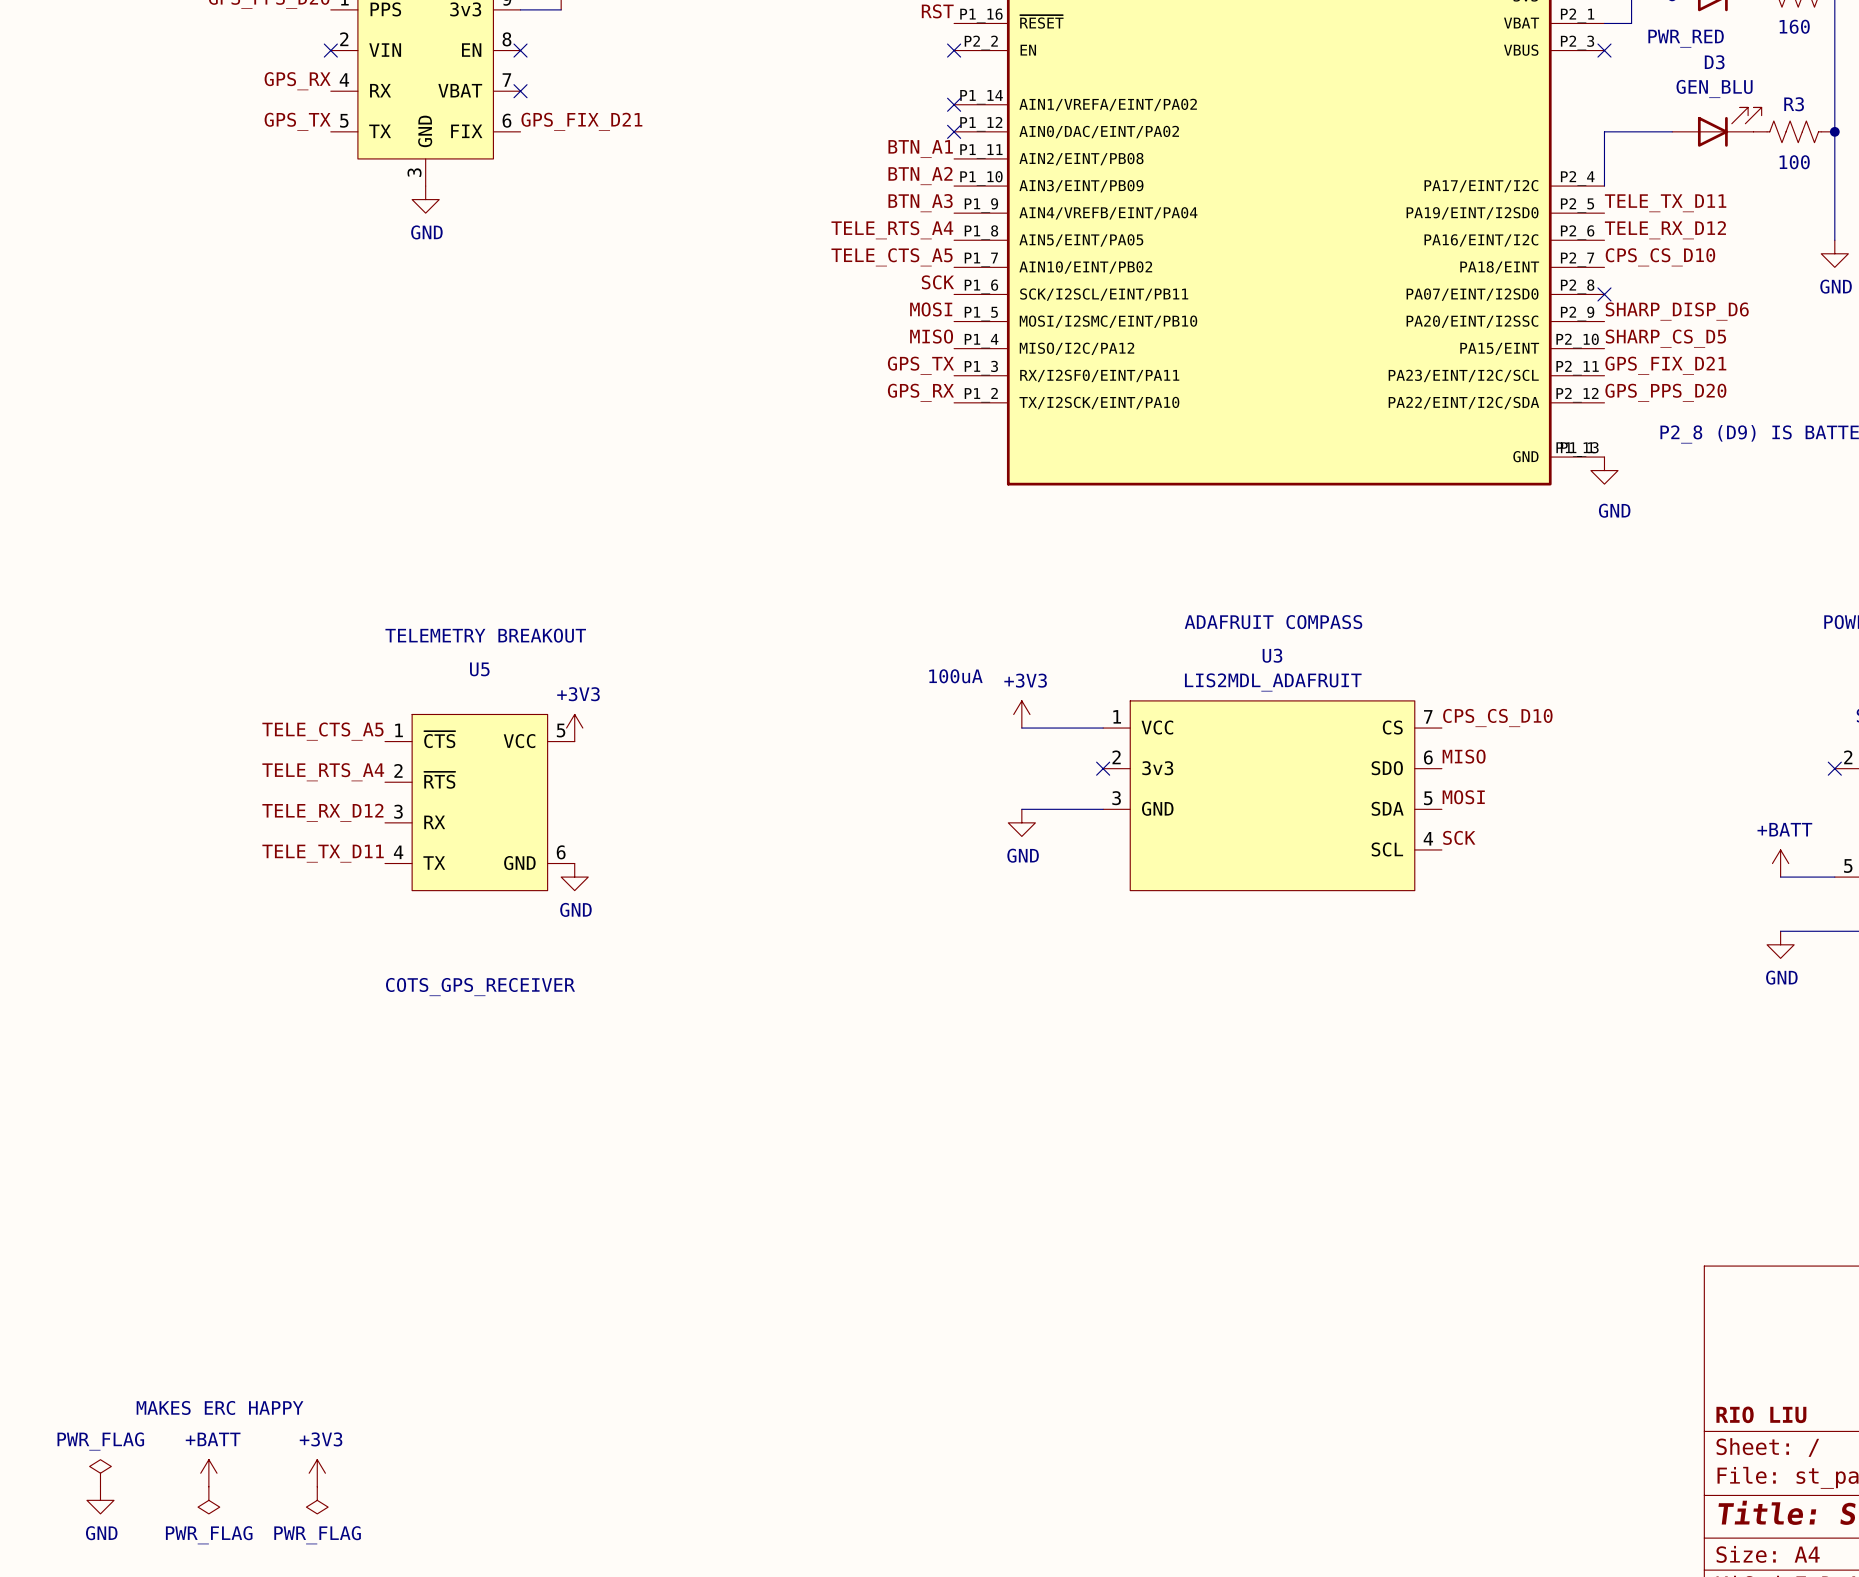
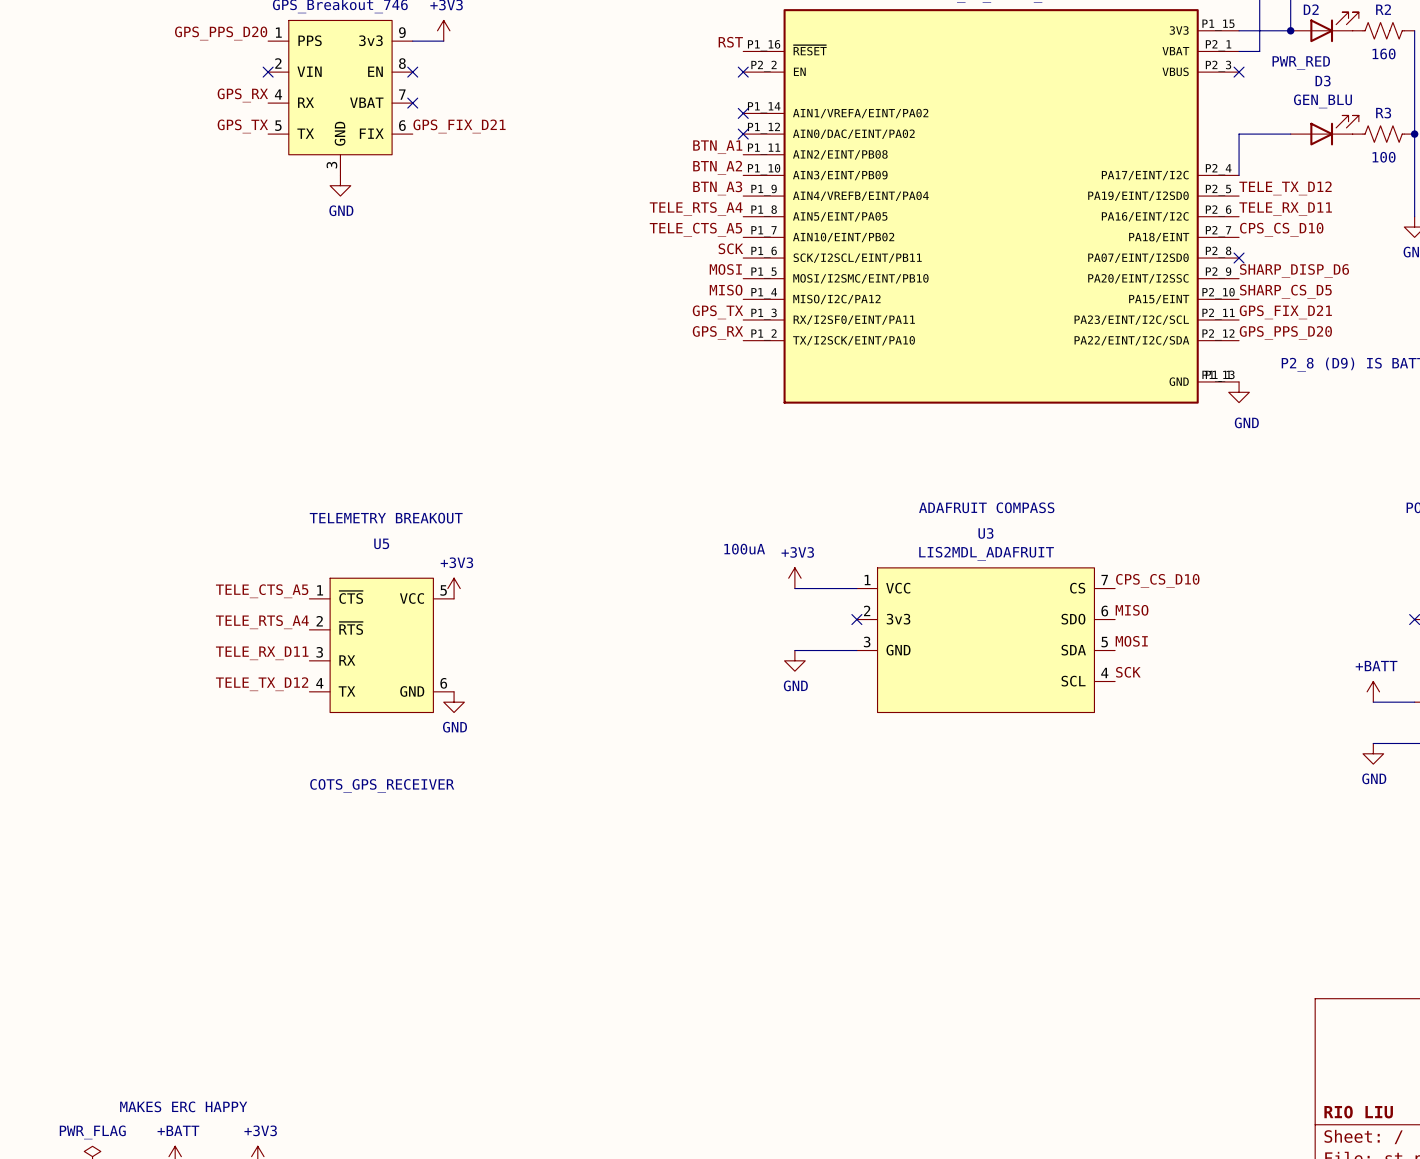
label: TELE_TX_D11 (1665, 203) -> TELE_TX_D12 (1285, 188)
label: TELE_RX_D12 (1665, 230) -> TELE_RX_D11 (1285, 209)
label: TELE_RX_D12 (322, 812) -> TELE_RX_D11 (262, 653)
label: TELE_TX_D11 (323, 853) -> TELE_TX_D12 (262, 684)

